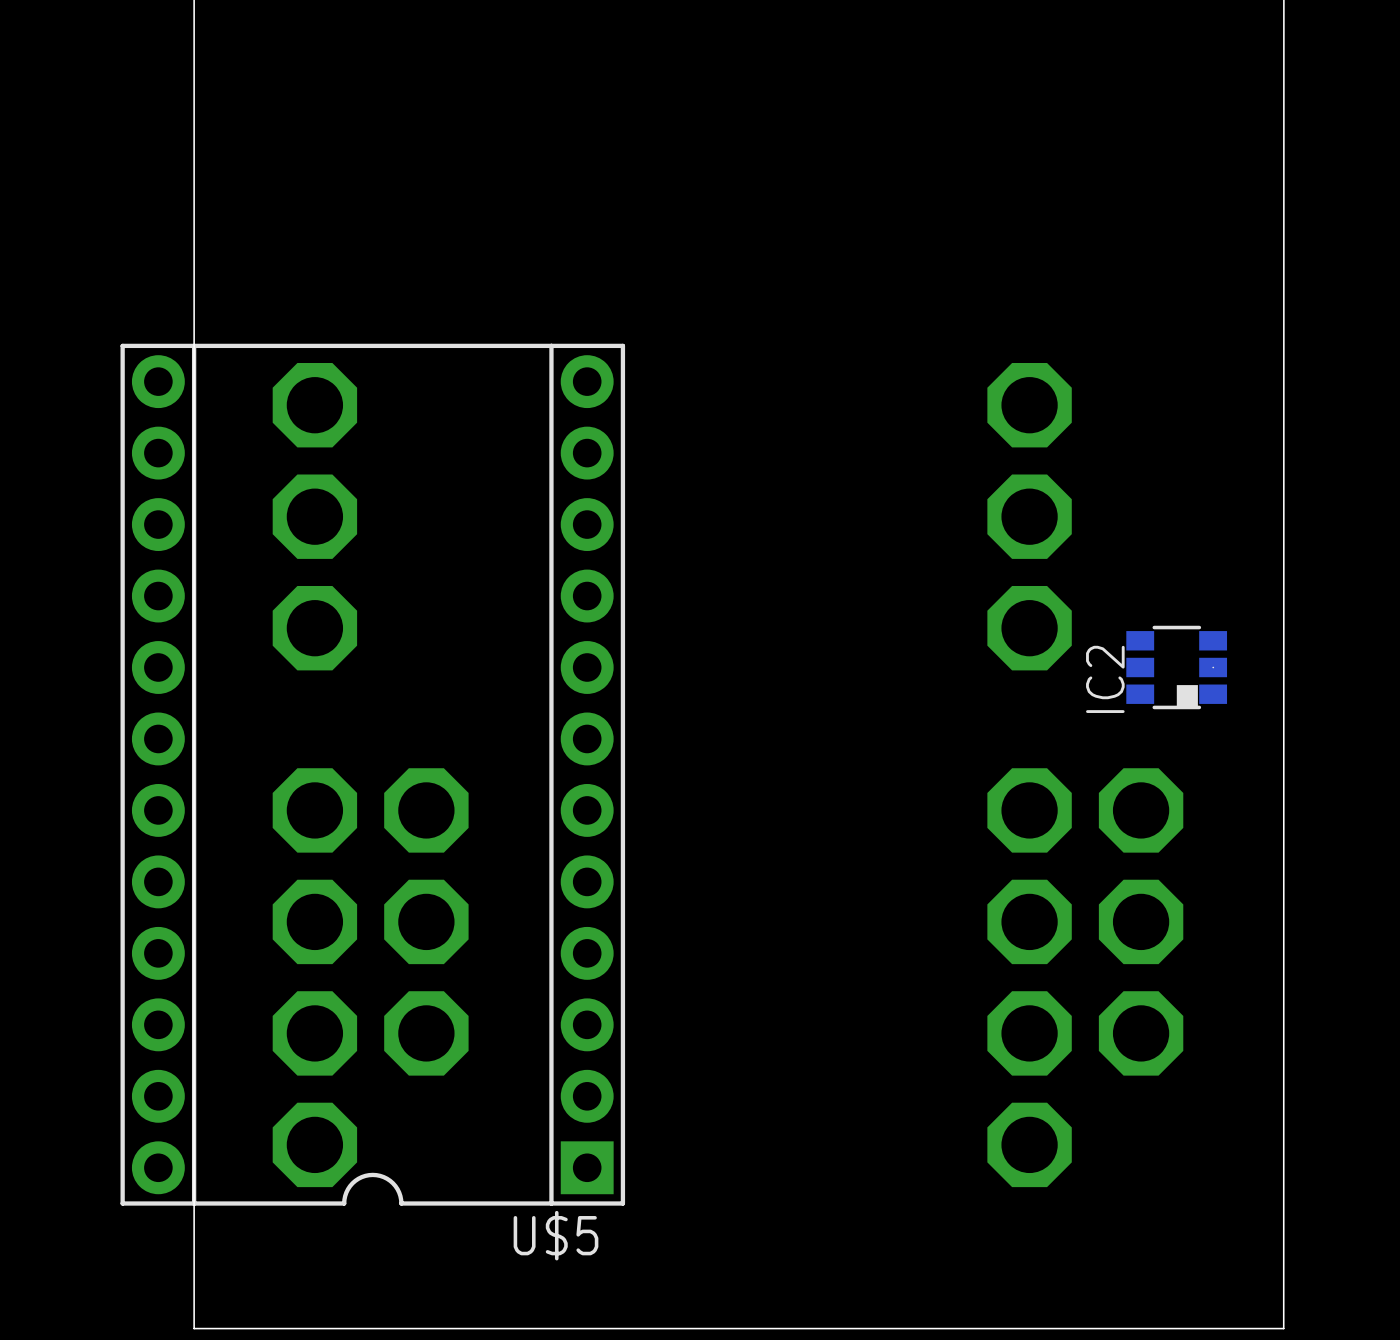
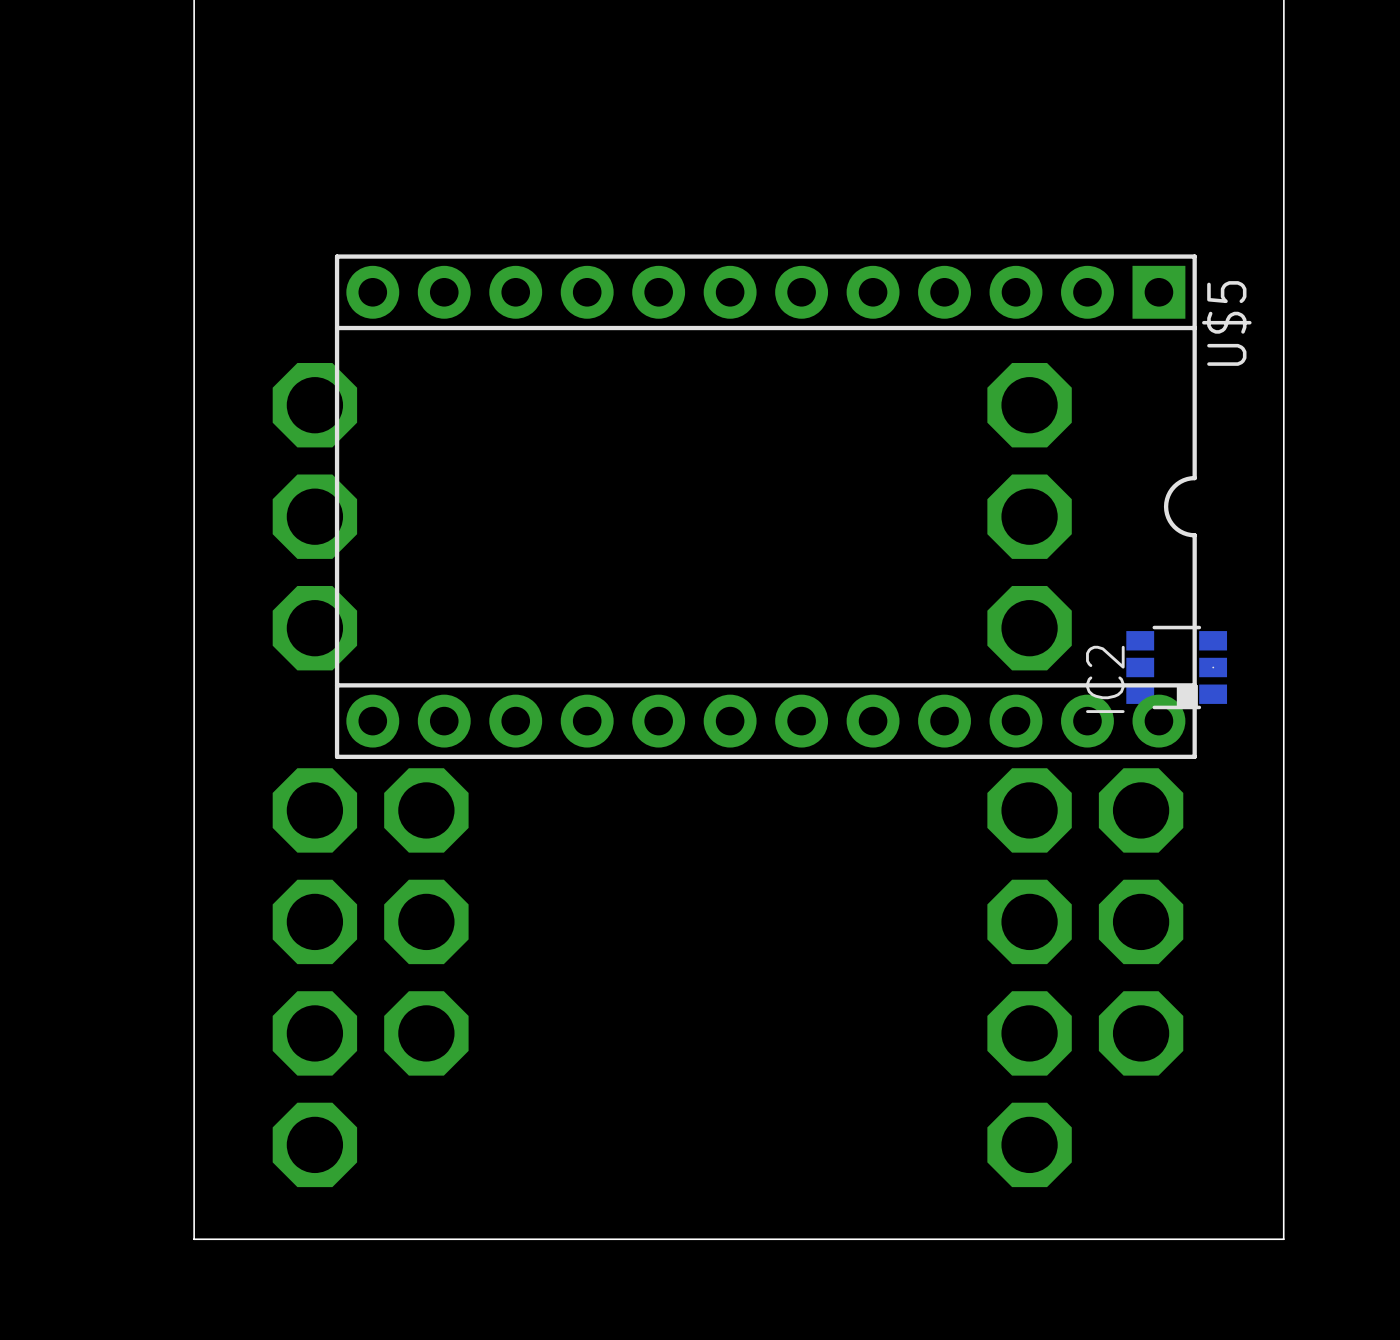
U$5 rotation: 0° (372, 774) -> 90° counterclockwise (765, 506)
board edge: (1283, 1239) (1283, 1328) (194, 1328) (194, 1239) -> (1283, 1239) (194, 1239)

